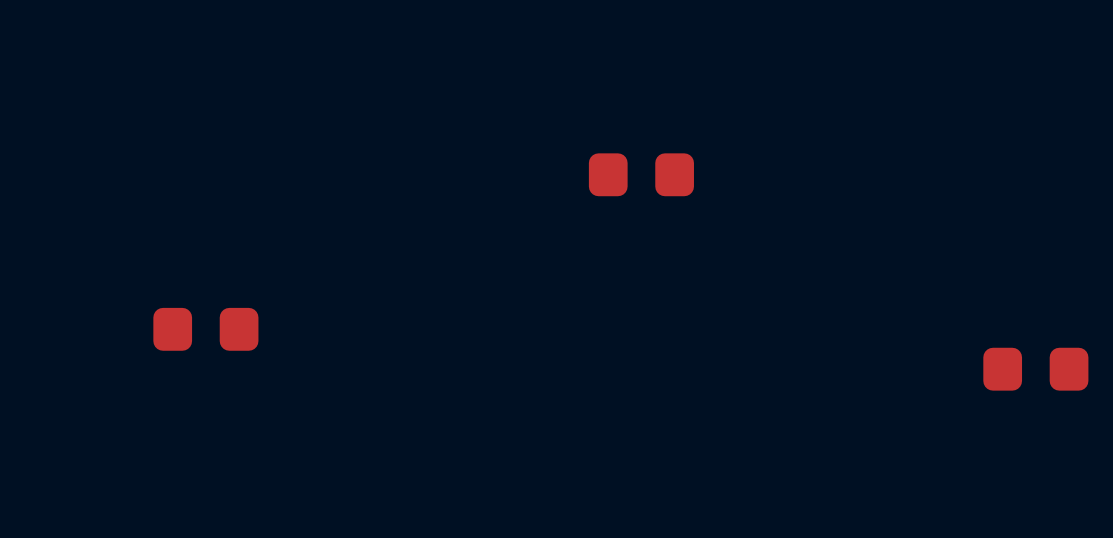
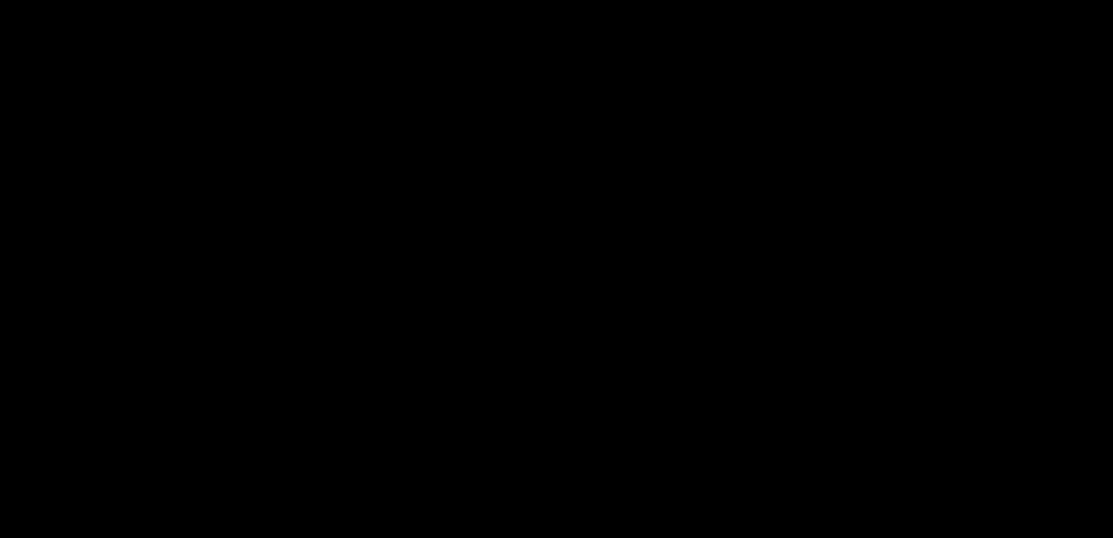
part: (641, 174) -> none
part: (205, 329) -> none
part: (1035, 369) -> none

